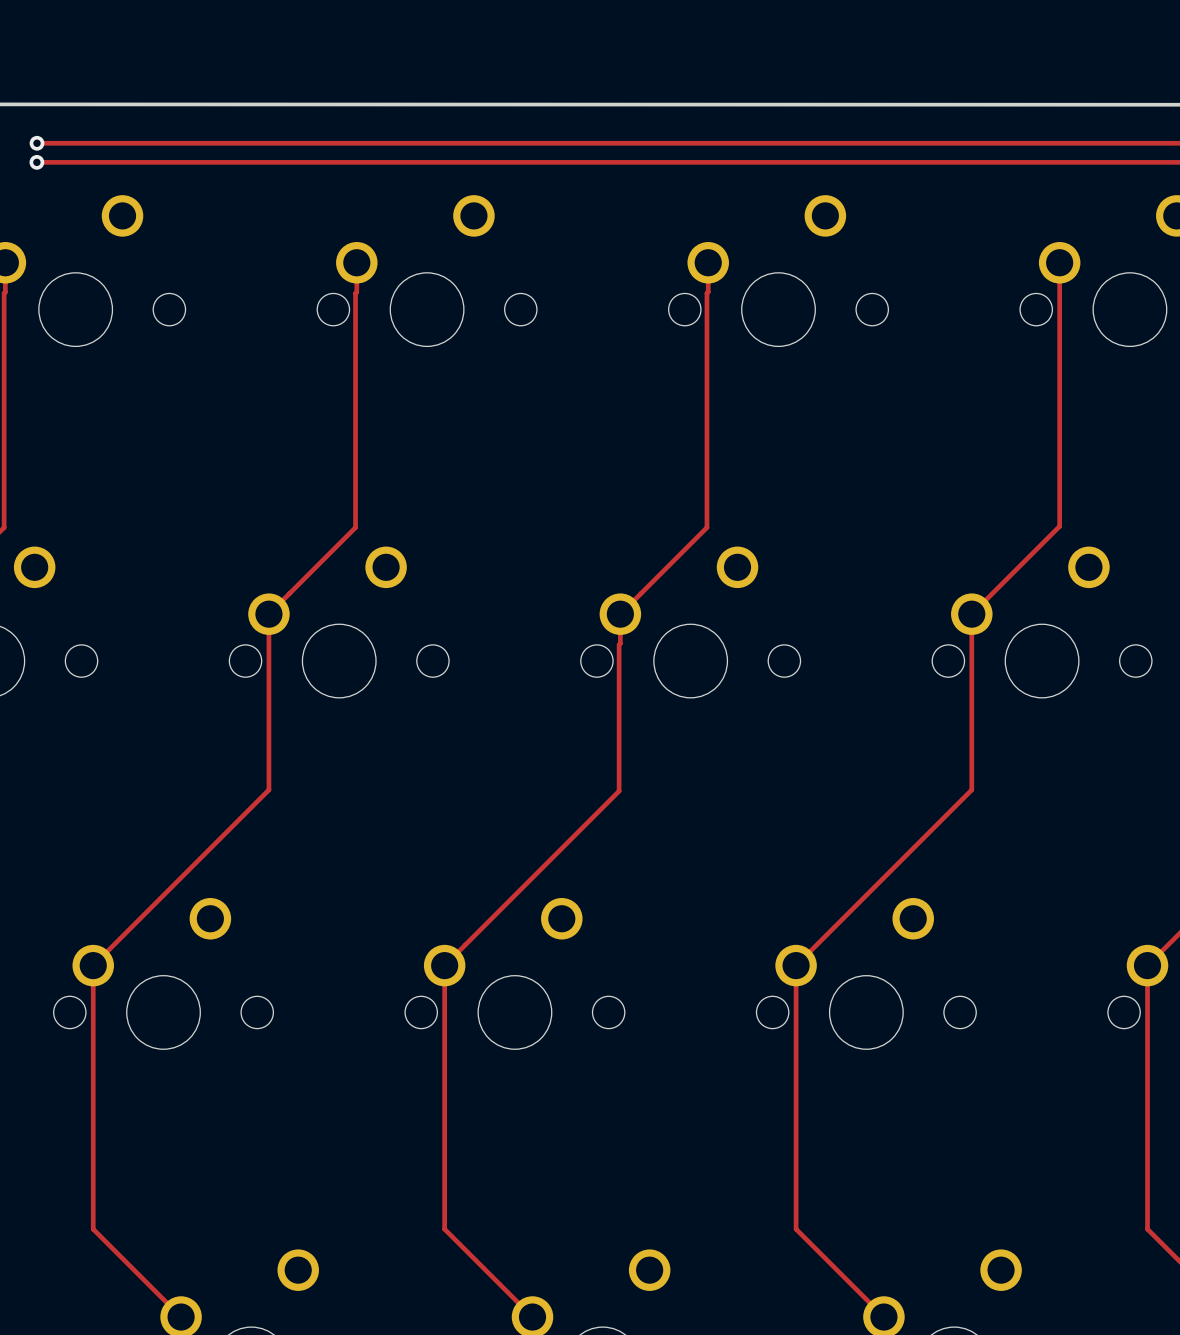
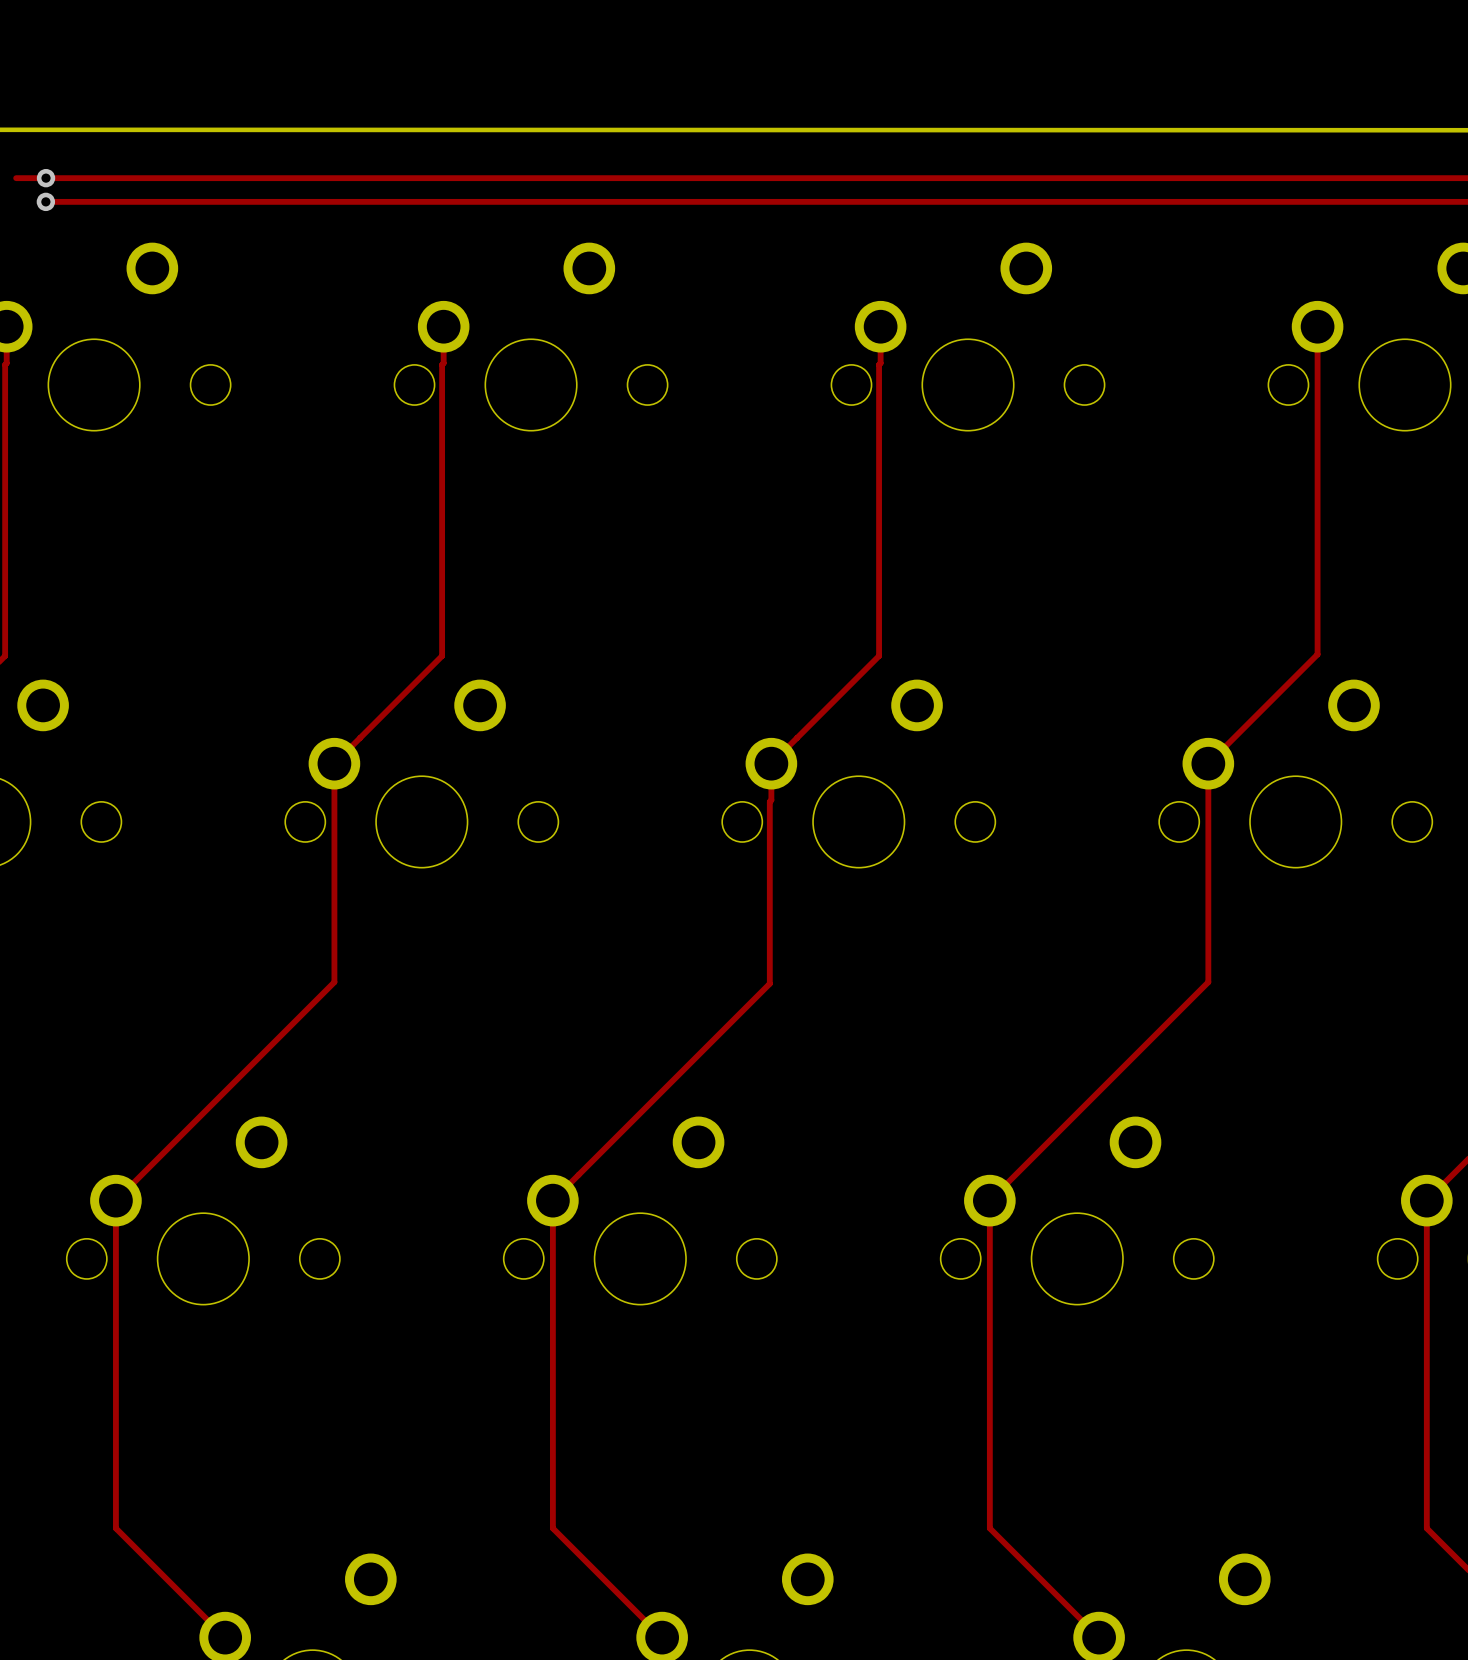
track: none -> (16, 178) (46, 178)

